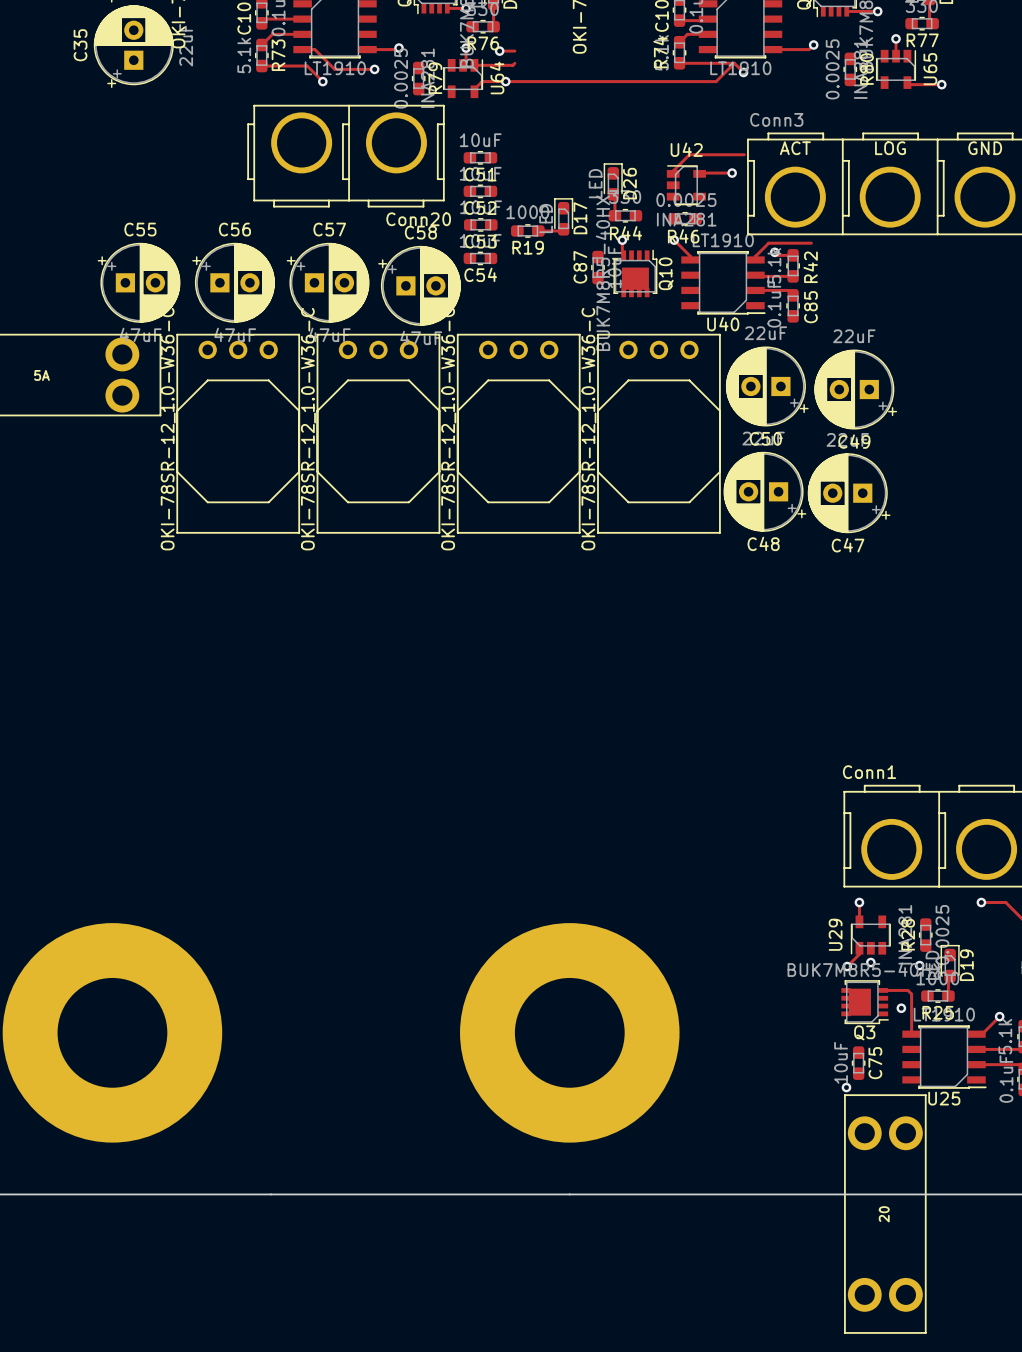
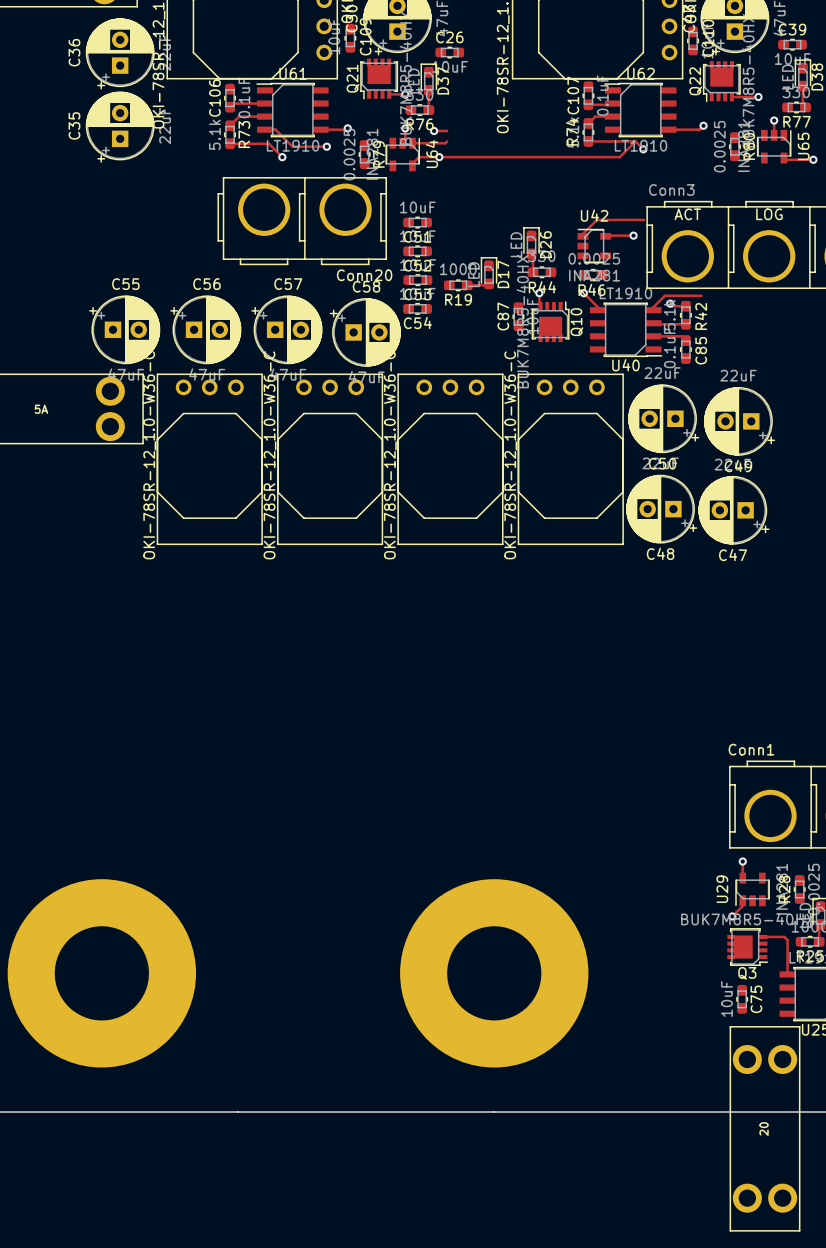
via: (870, 962) -> none
via: (919, 965) -> none
via: (901, 1008) -> none
via: (846, 1087) -> none

